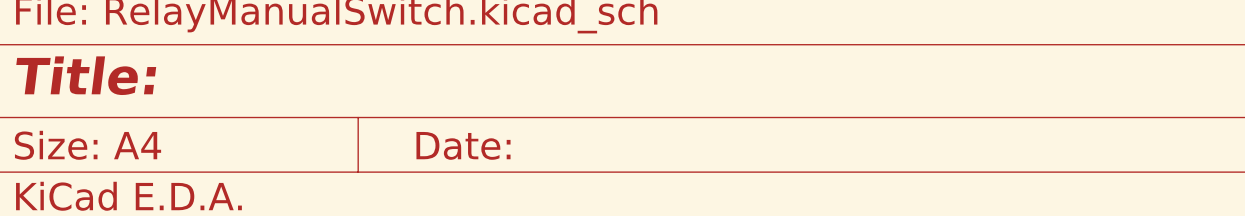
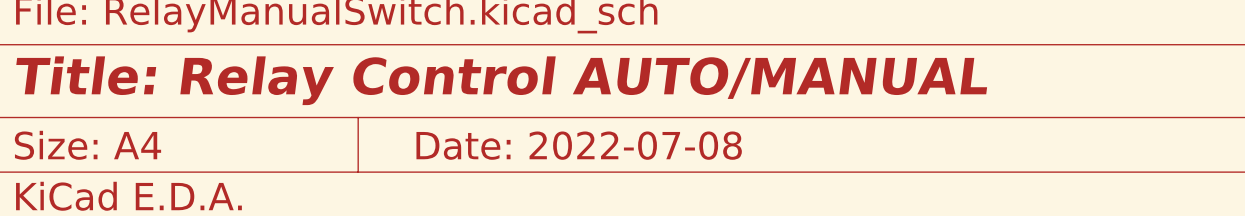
title block: Title: (86, 75) -> Title: Relay Control AUTO/MANUAL (501, 80)
title block: Date: (463, 145) -> Date: 2022-07-08 (579, 145)

